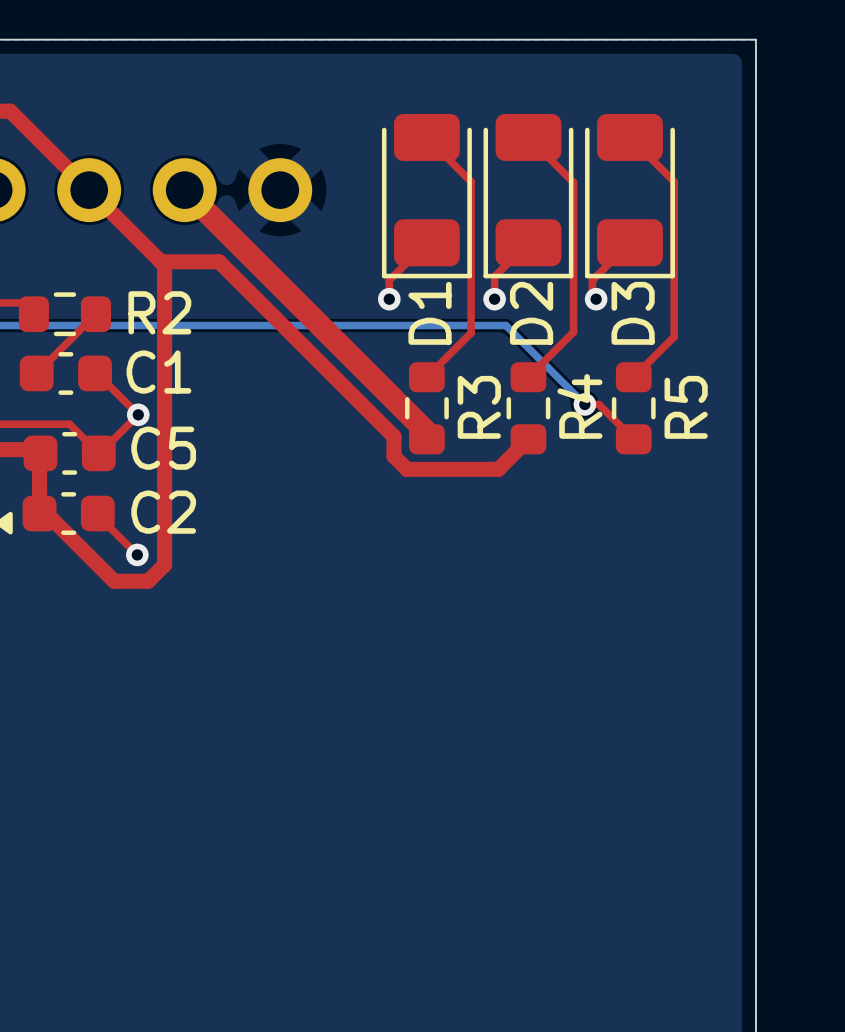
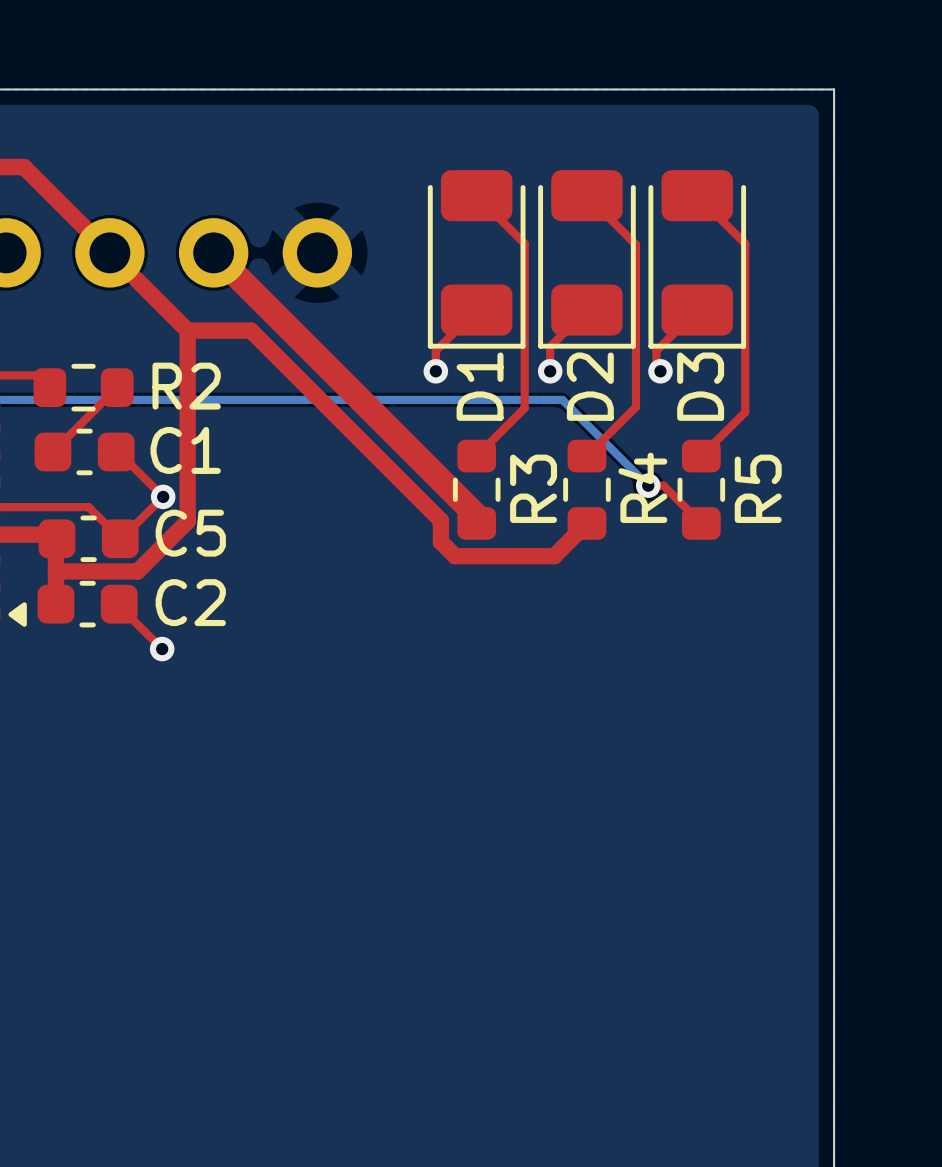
top track: (160, 261) (164, 265) (164, 564) (148, 581) (114, 581) (39, 506) -> (187, 330) (187, 521) (137, 571) (55, 571)

